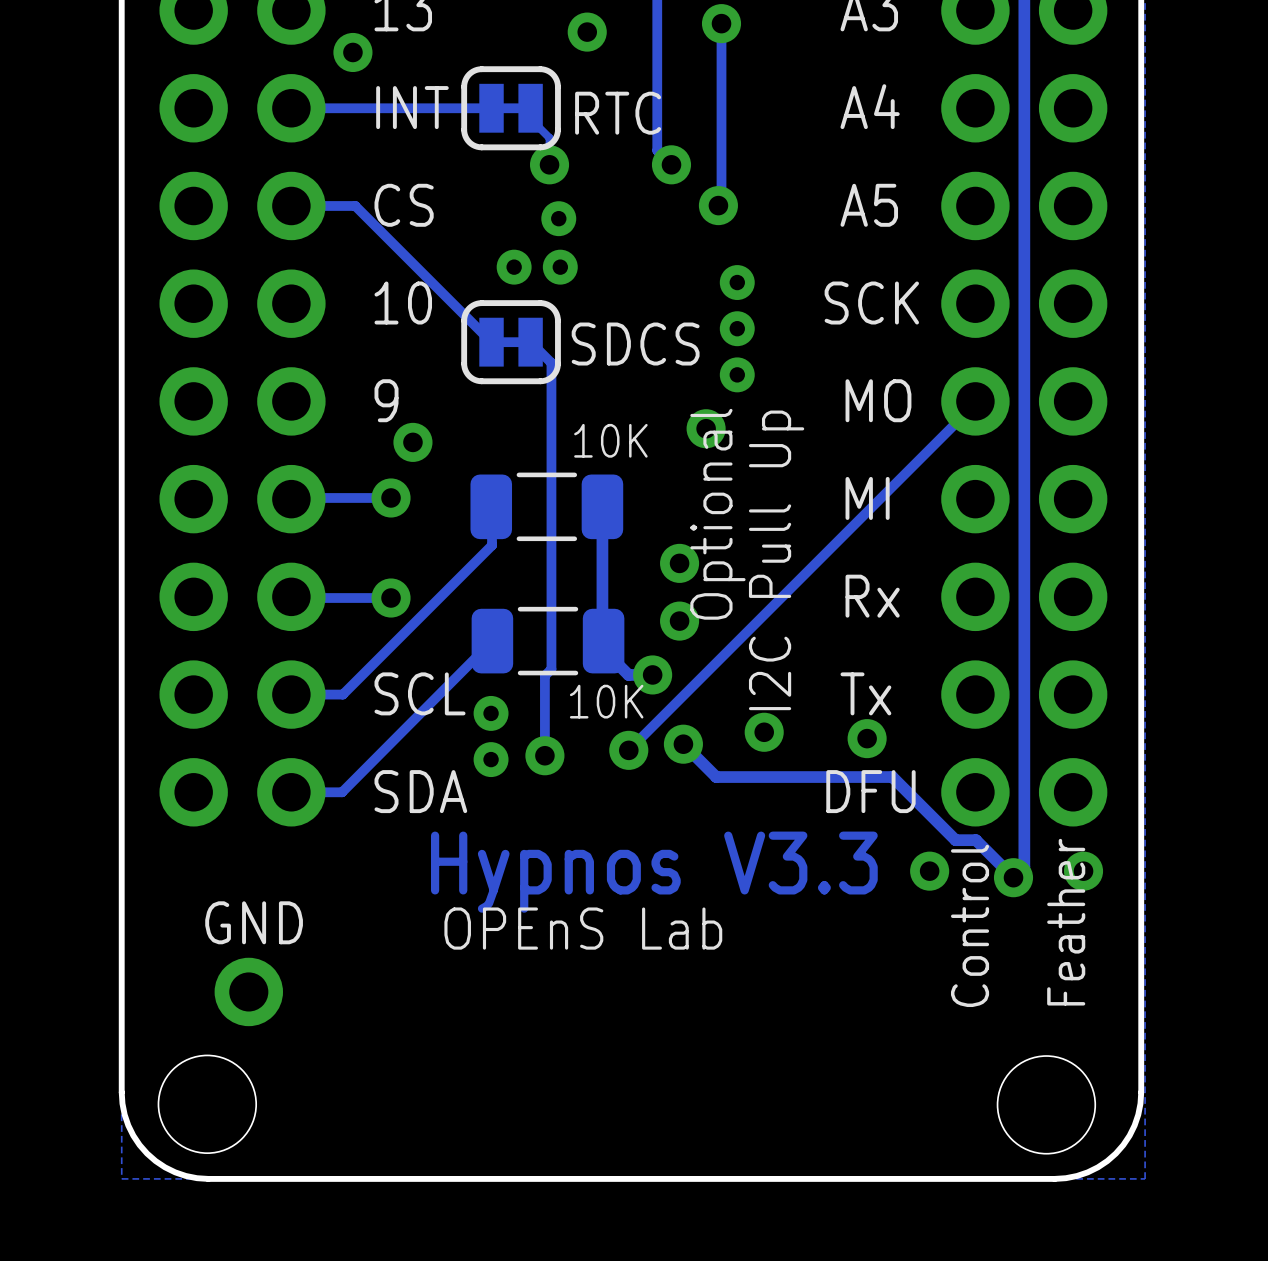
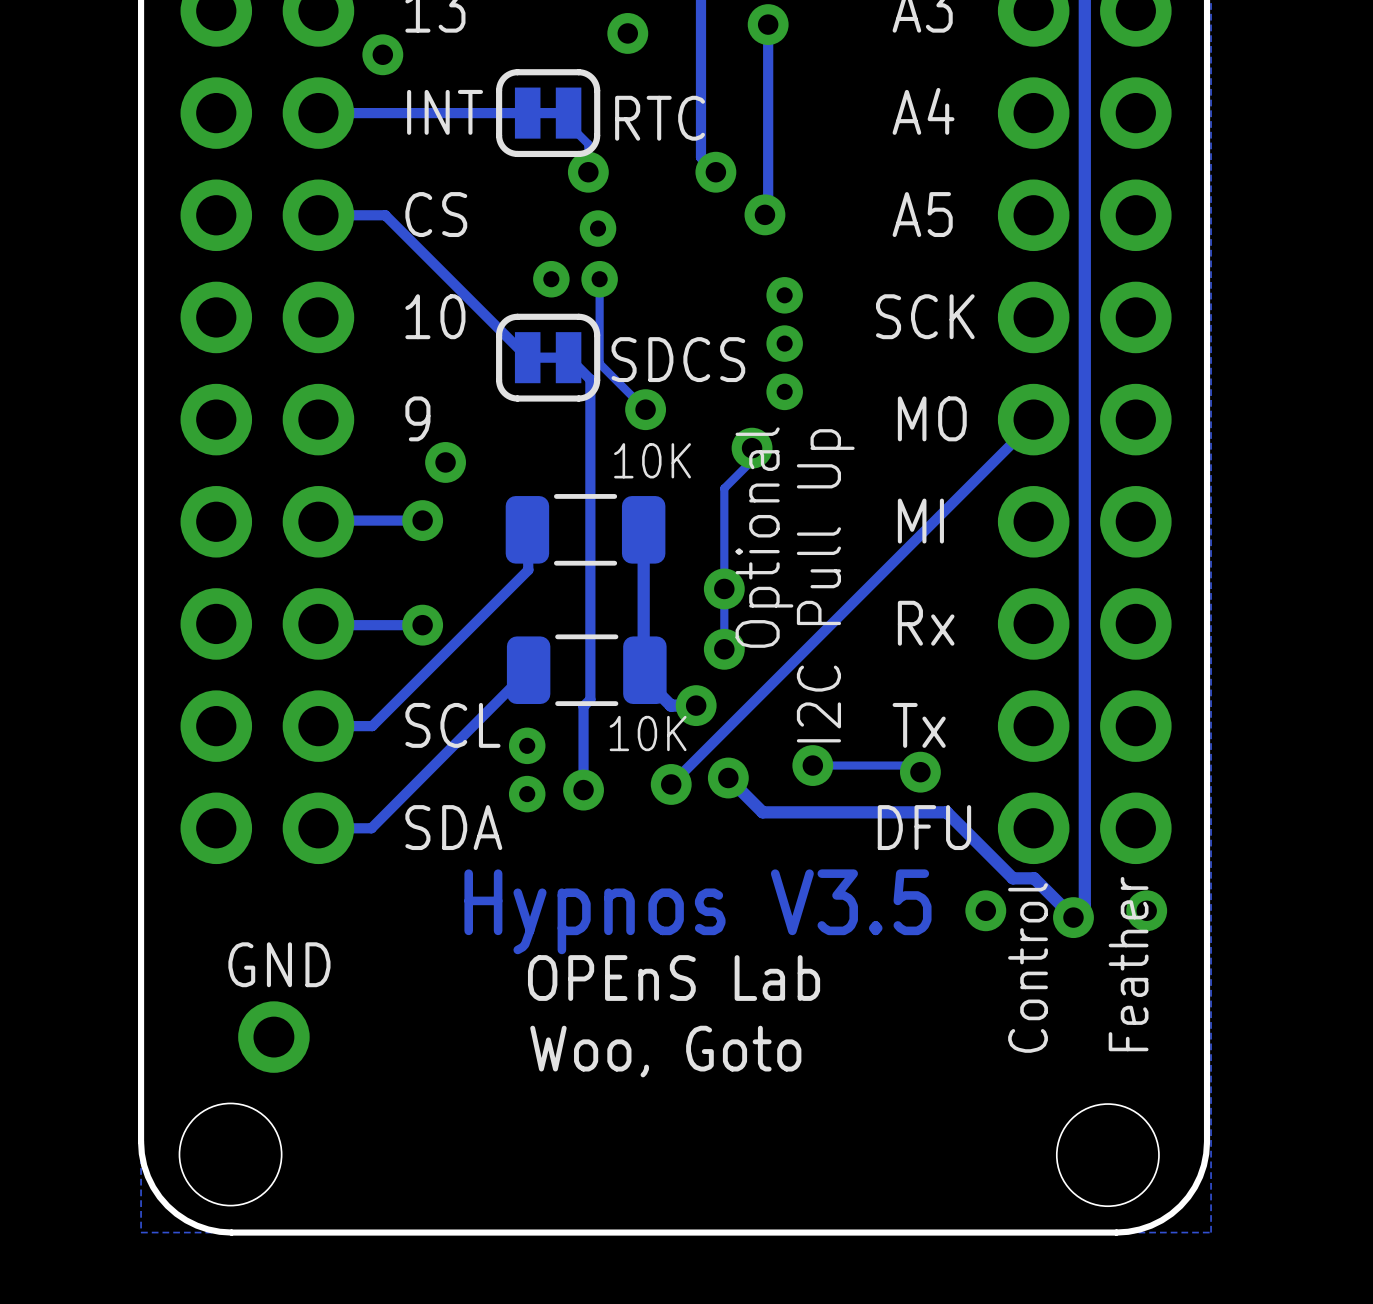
track: none -> (599, 279) (599, 363) (645, 409)
via: none -> (645, 409)
track: none -> (752, 448) (752, 460) (724, 488) (724, 649)
track: none -> (812, 765) (913, 765) (920, 772)
text: Hypnos V3.3 (654, 872) -> Hypnos V3.5 (697, 911)
text position: OPEnS Lab (583, 928) -> OPEnS Lab (674, 978)
text: none -> Woo, Goto (665, 1051)

